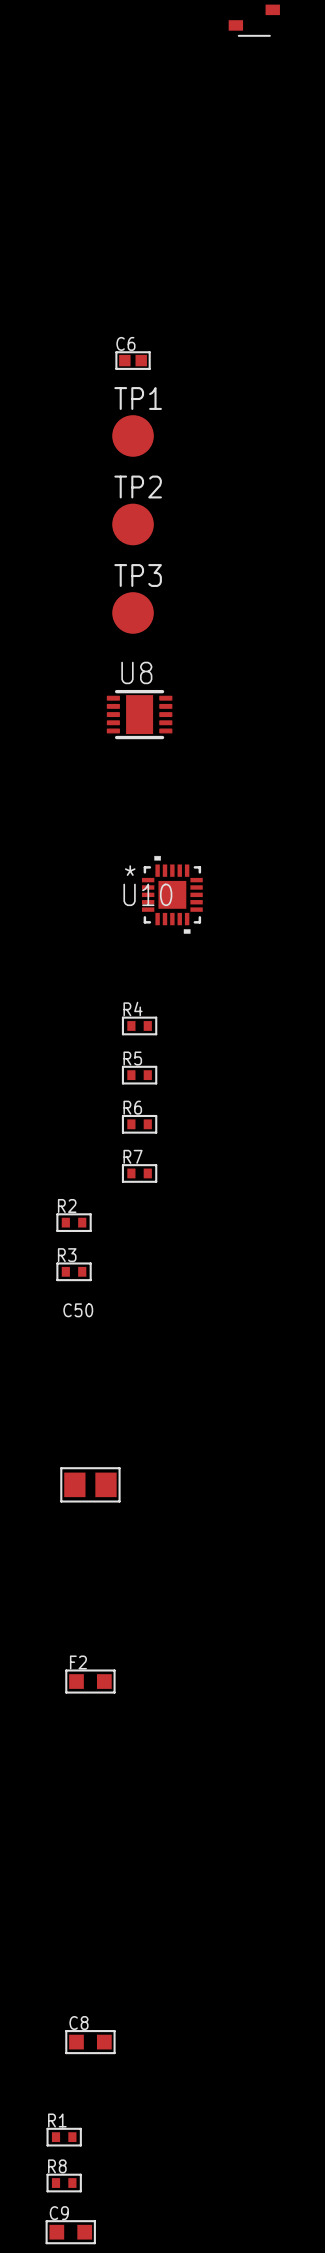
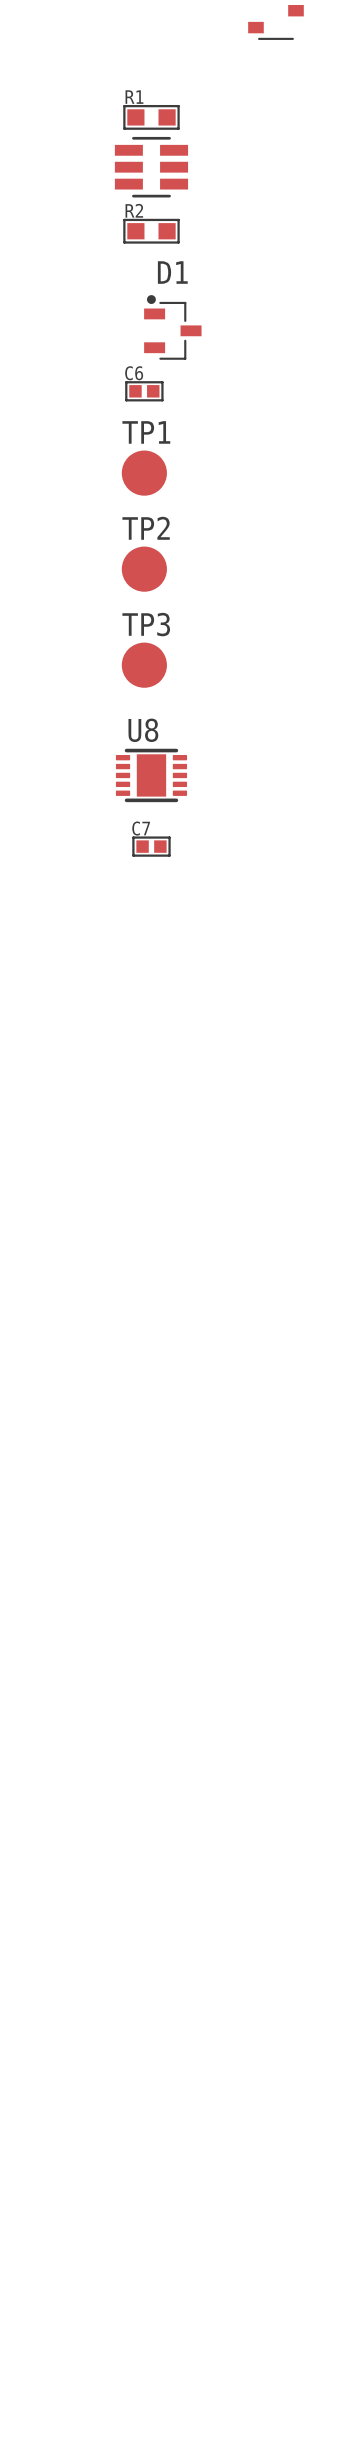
part: none -> (151, 167)
D1: none -> (172, 327)
C7: none -> (151, 846)
U10: (172, 894) -> none
R4: (139, 1025) -> none
R5: (139, 1075) -> none
R6: (139, 1124) -> none
R7: (139, 1173) -> none
R2 footprint: [56, 1213, 92, 1233] -> [123, 218, 180, 244]
R3: (74, 1271) -> none
C50: (90, 1484) -> none
F2: (90, 1681) -> none
C8: (90, 2042) -> none
R1 footprint: [46, 2127, 82, 2147] -> [123, 104, 180, 130]
R8: (64, 2183) -> none
C9: (70, 2232) -> none

